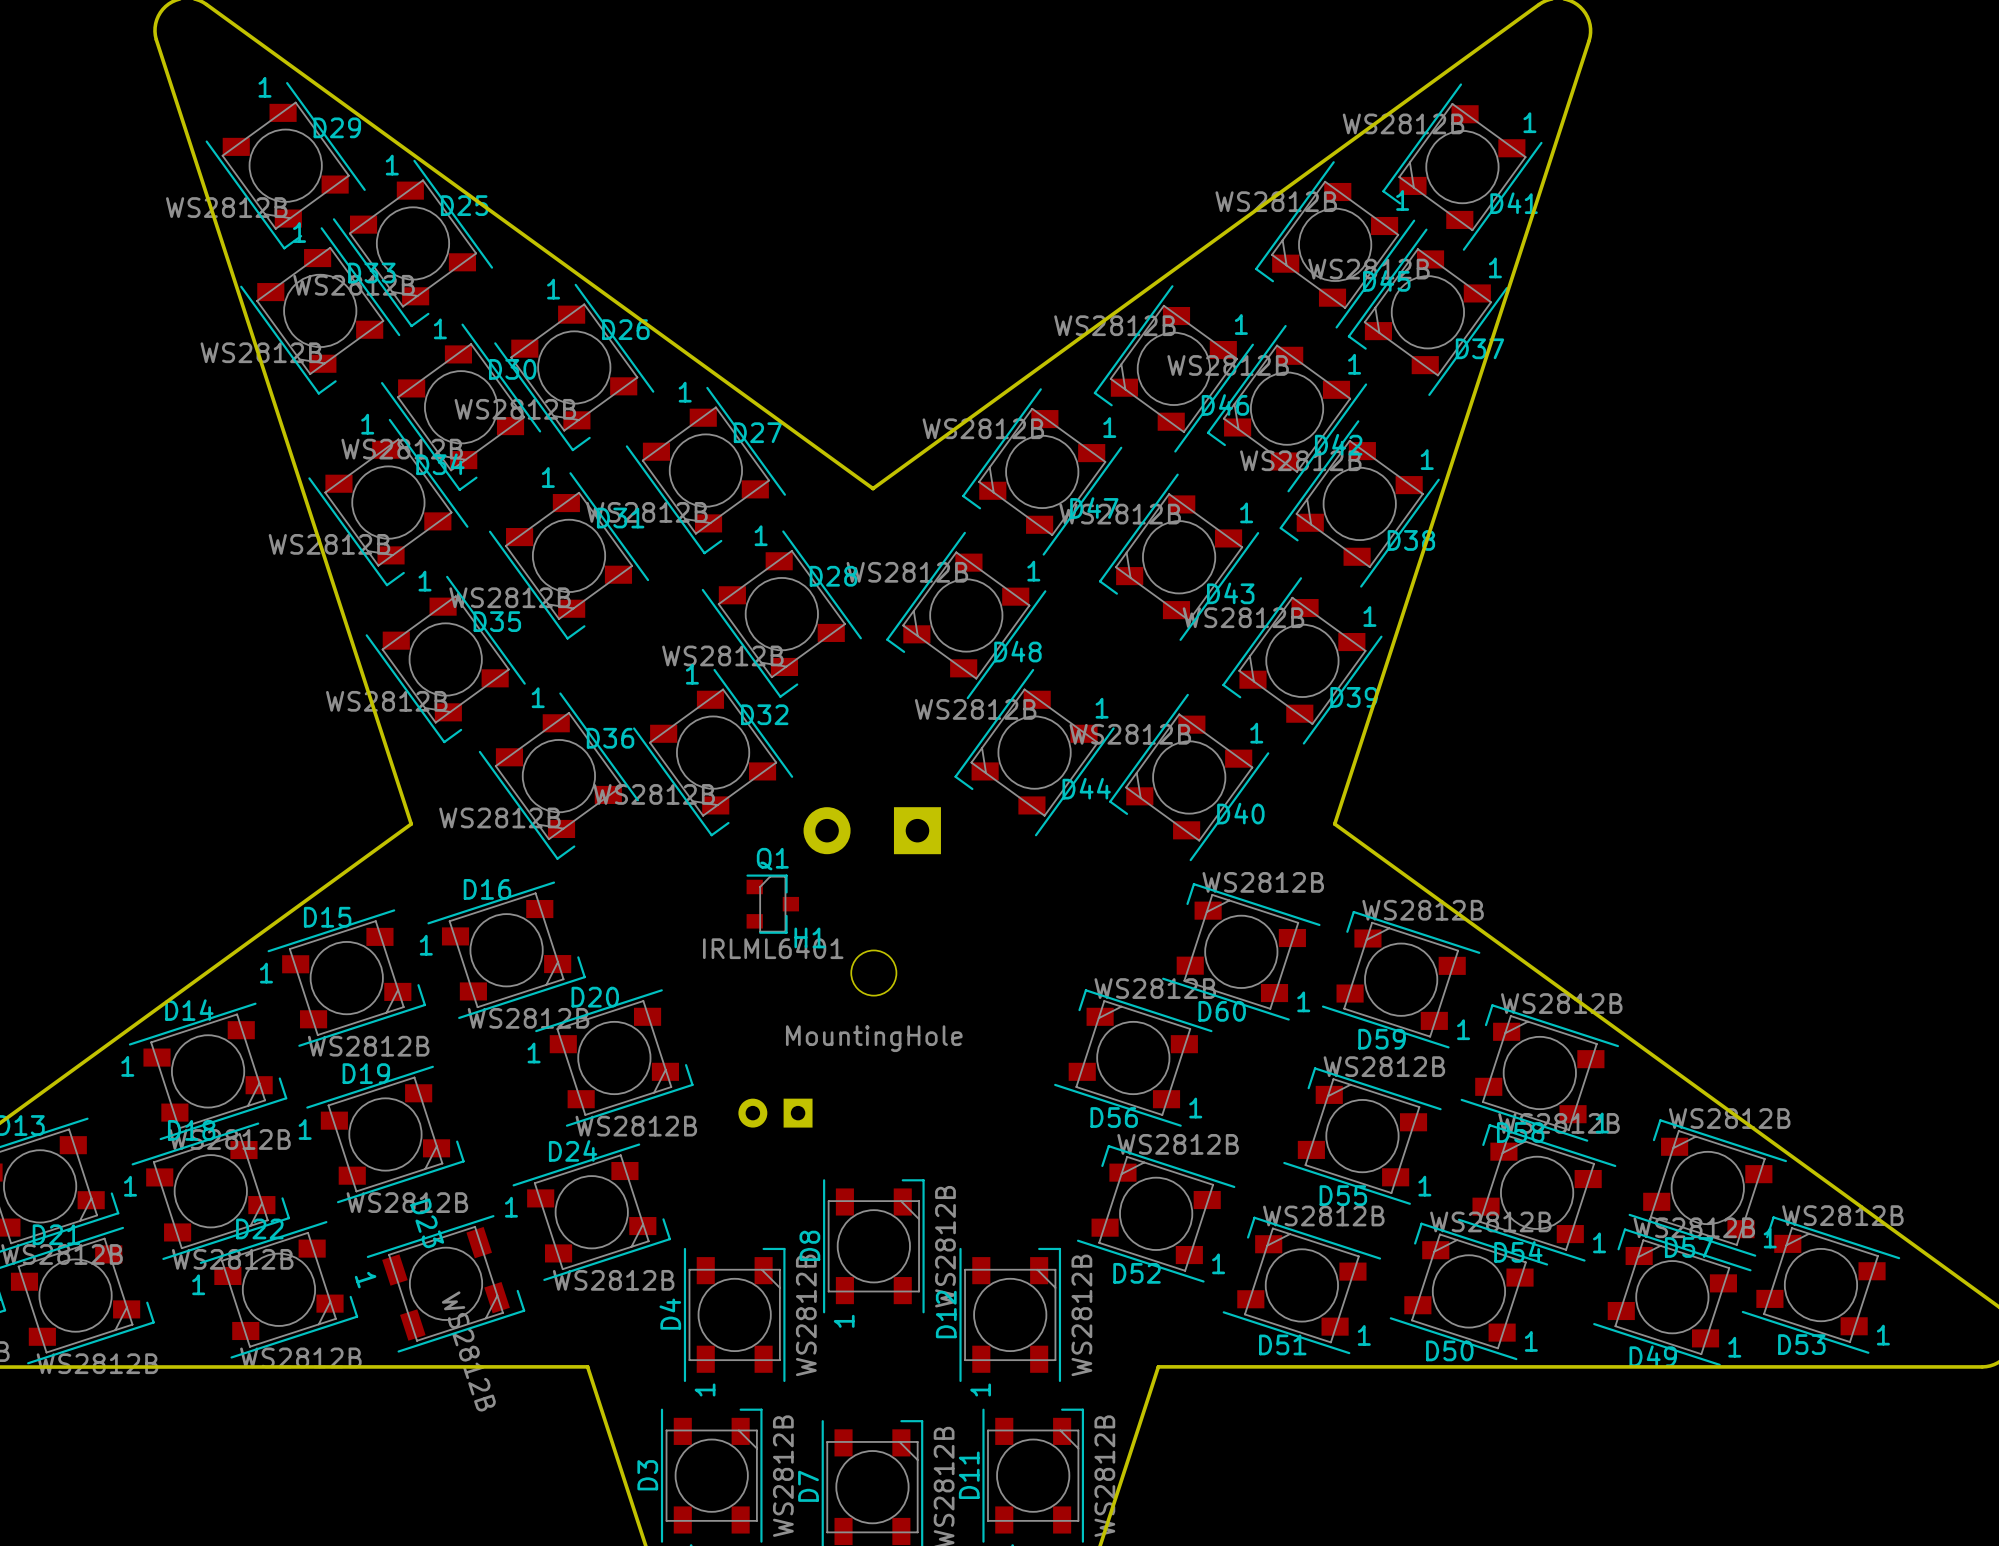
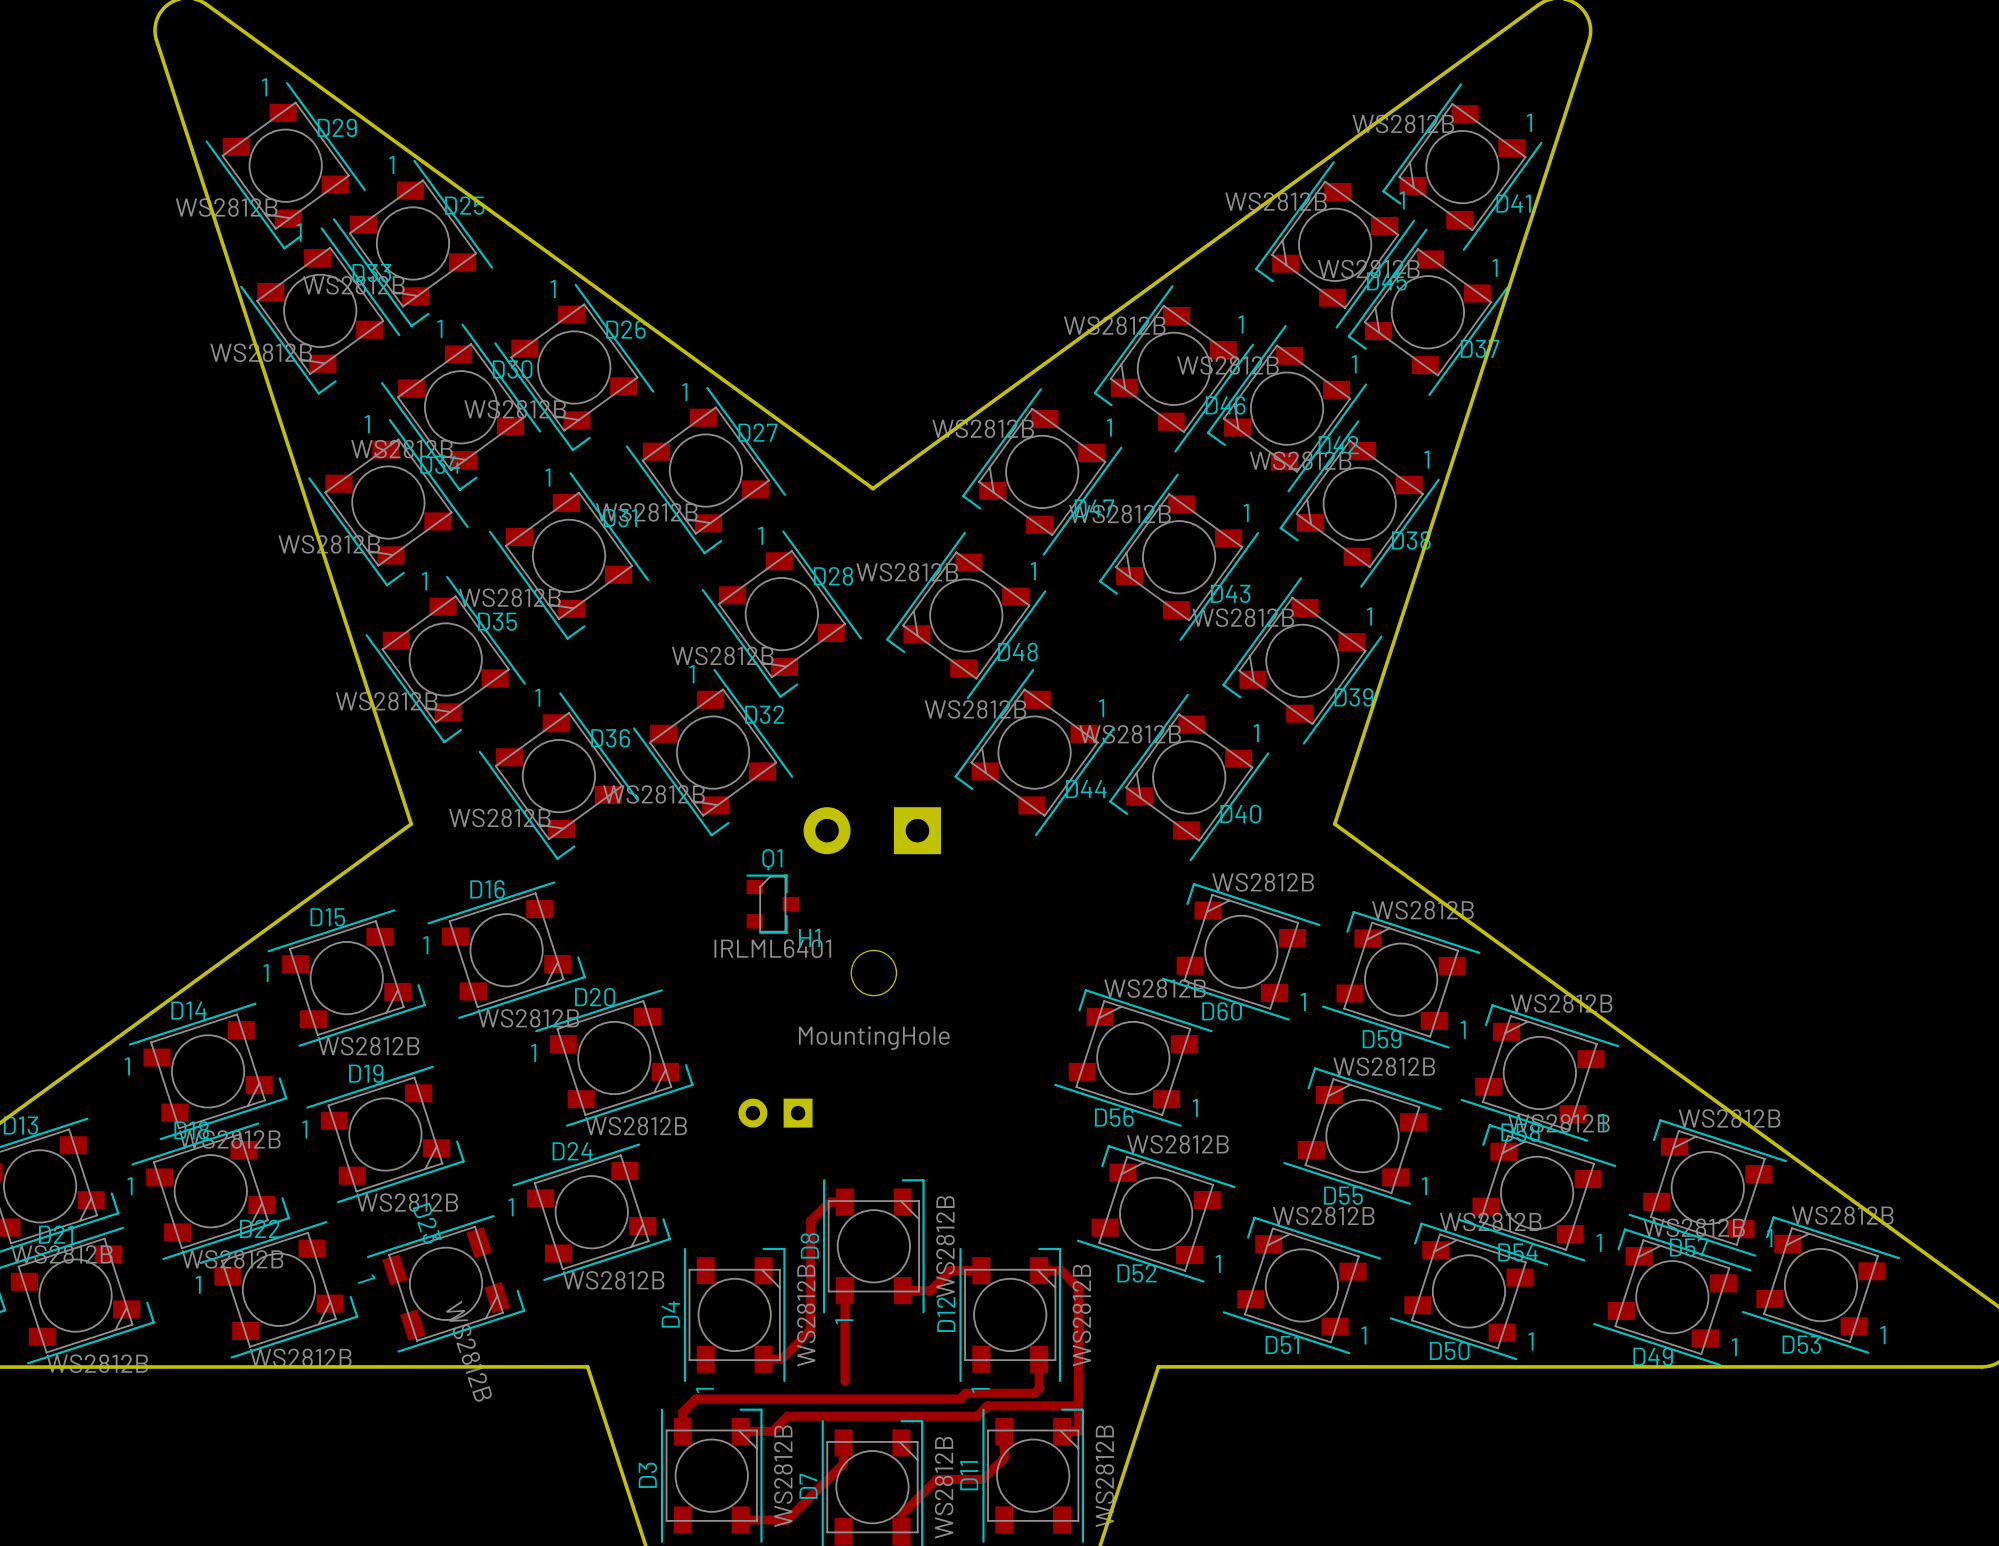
track: none -> (844, 1201) (829, 1201) (810, 1221) (810, 1330) (781, 1359) (763, 1359)
track: none -> (981, 1270) (950, 1270) (930, 1290) (902, 1290)
track: none -> (1039, 1270) (1061, 1270) (1078, 1287) (1078, 1431) (1062, 1431)
track: none -> (844, 1290) (844, 1381)
track: none -> (1039, 1359) (1039, 1388) (1034, 1393) (965, 1393) (959, 1398) (695, 1398) (682, 1412) (682, 1431)
track: none -> (1078, 1408) (1075, 1405) (987, 1405) (977, 1416) (787, 1416) (772, 1431) (740, 1431)
track: none -> (1004, 1431) (1004, 1458) (982, 1479) (936, 1479) (901, 1514) (901, 1531)
track: none -> (843, 1442) (843, 1463) (787, 1519) (740, 1519)

